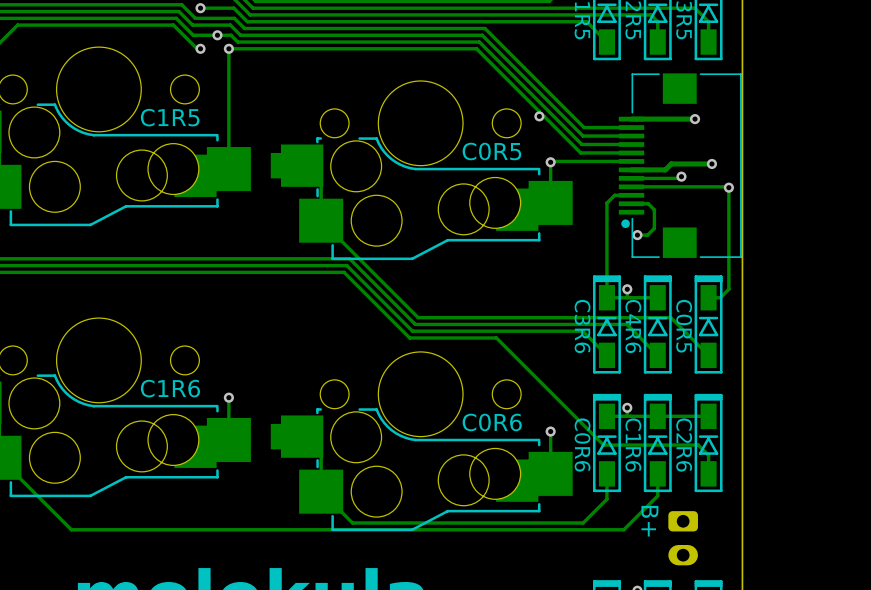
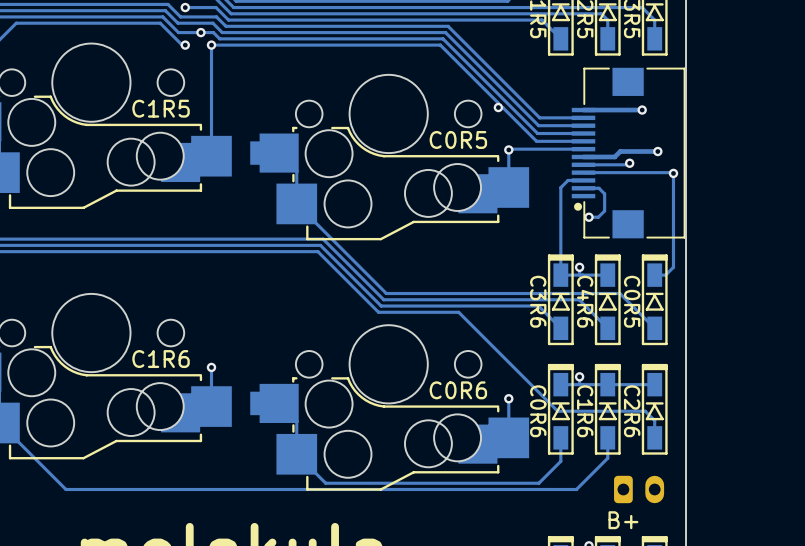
part rotation: 0° (683, 538) -> 90° counterclockwise (639, 489)

